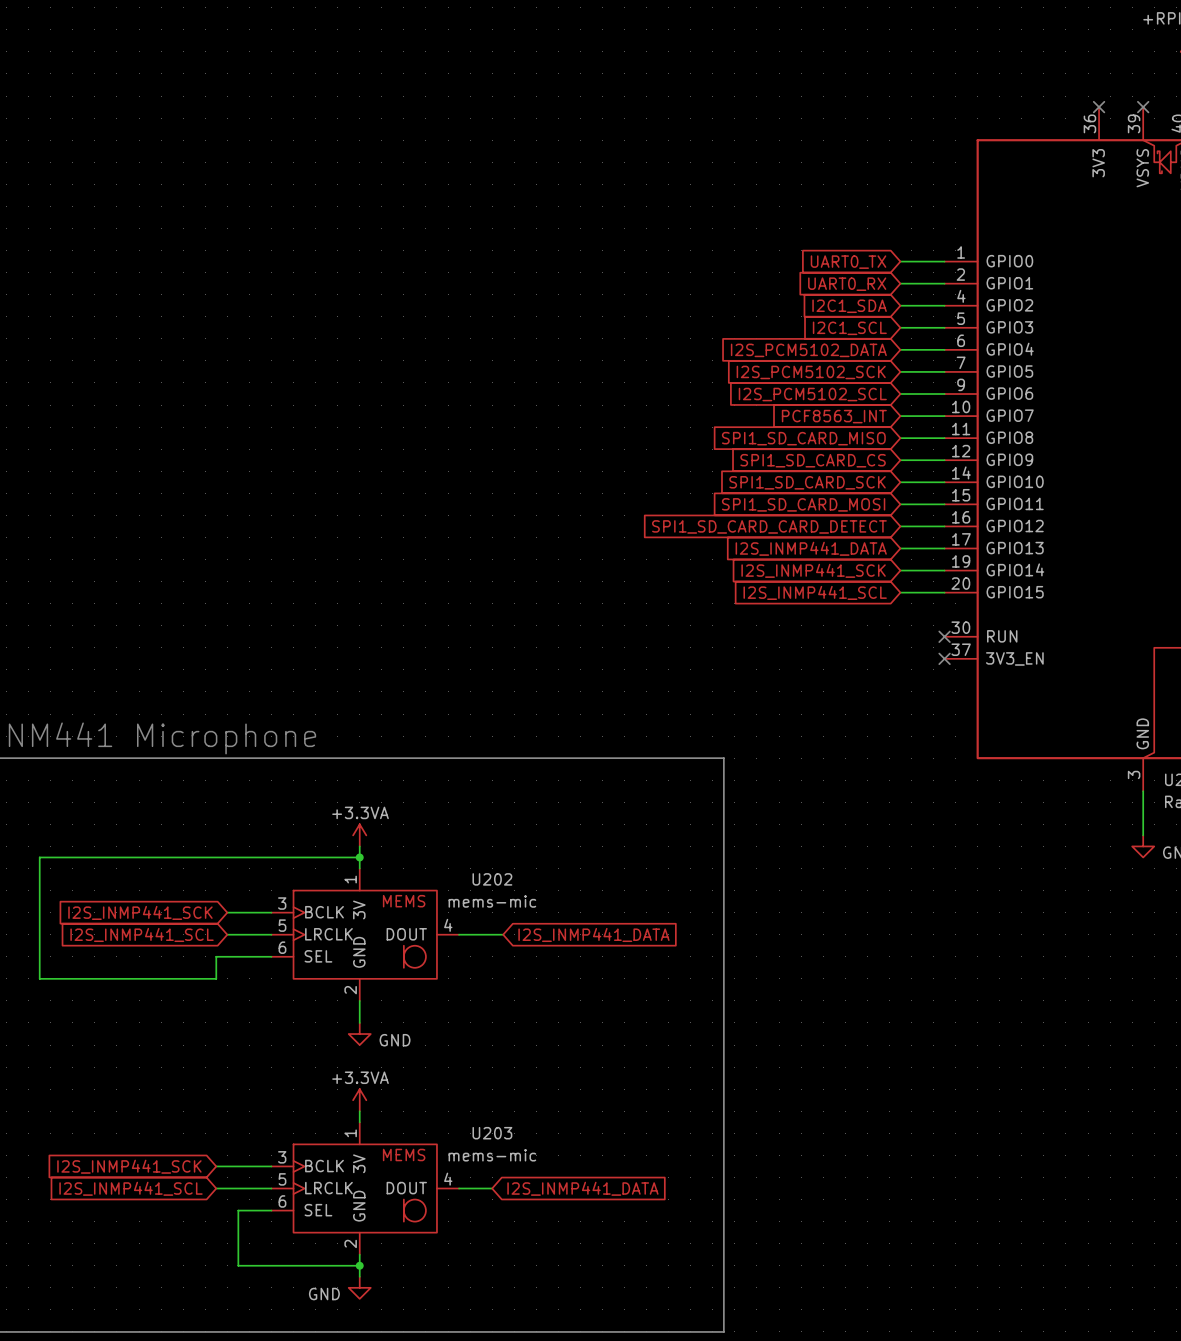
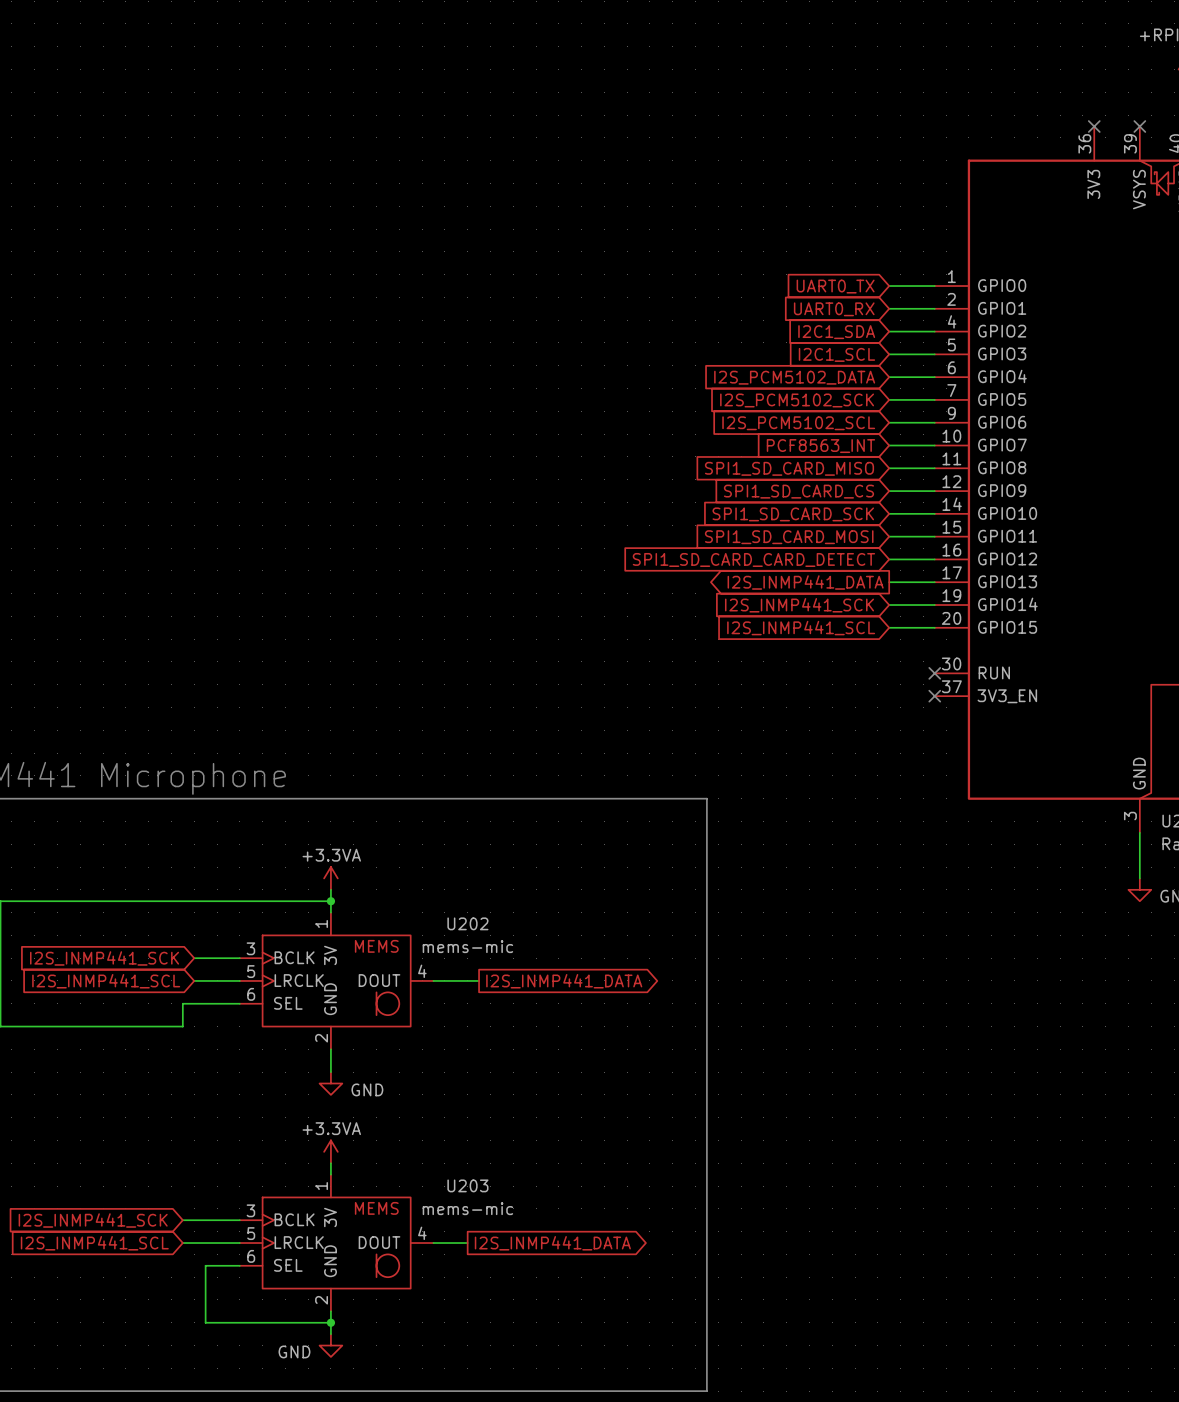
global label shape: input (811, 548) -> output (805, 582)
global label shape: input (593, 934) -> output (564, 981)
global label shape: input (582, 1188) -> output (552, 1243)

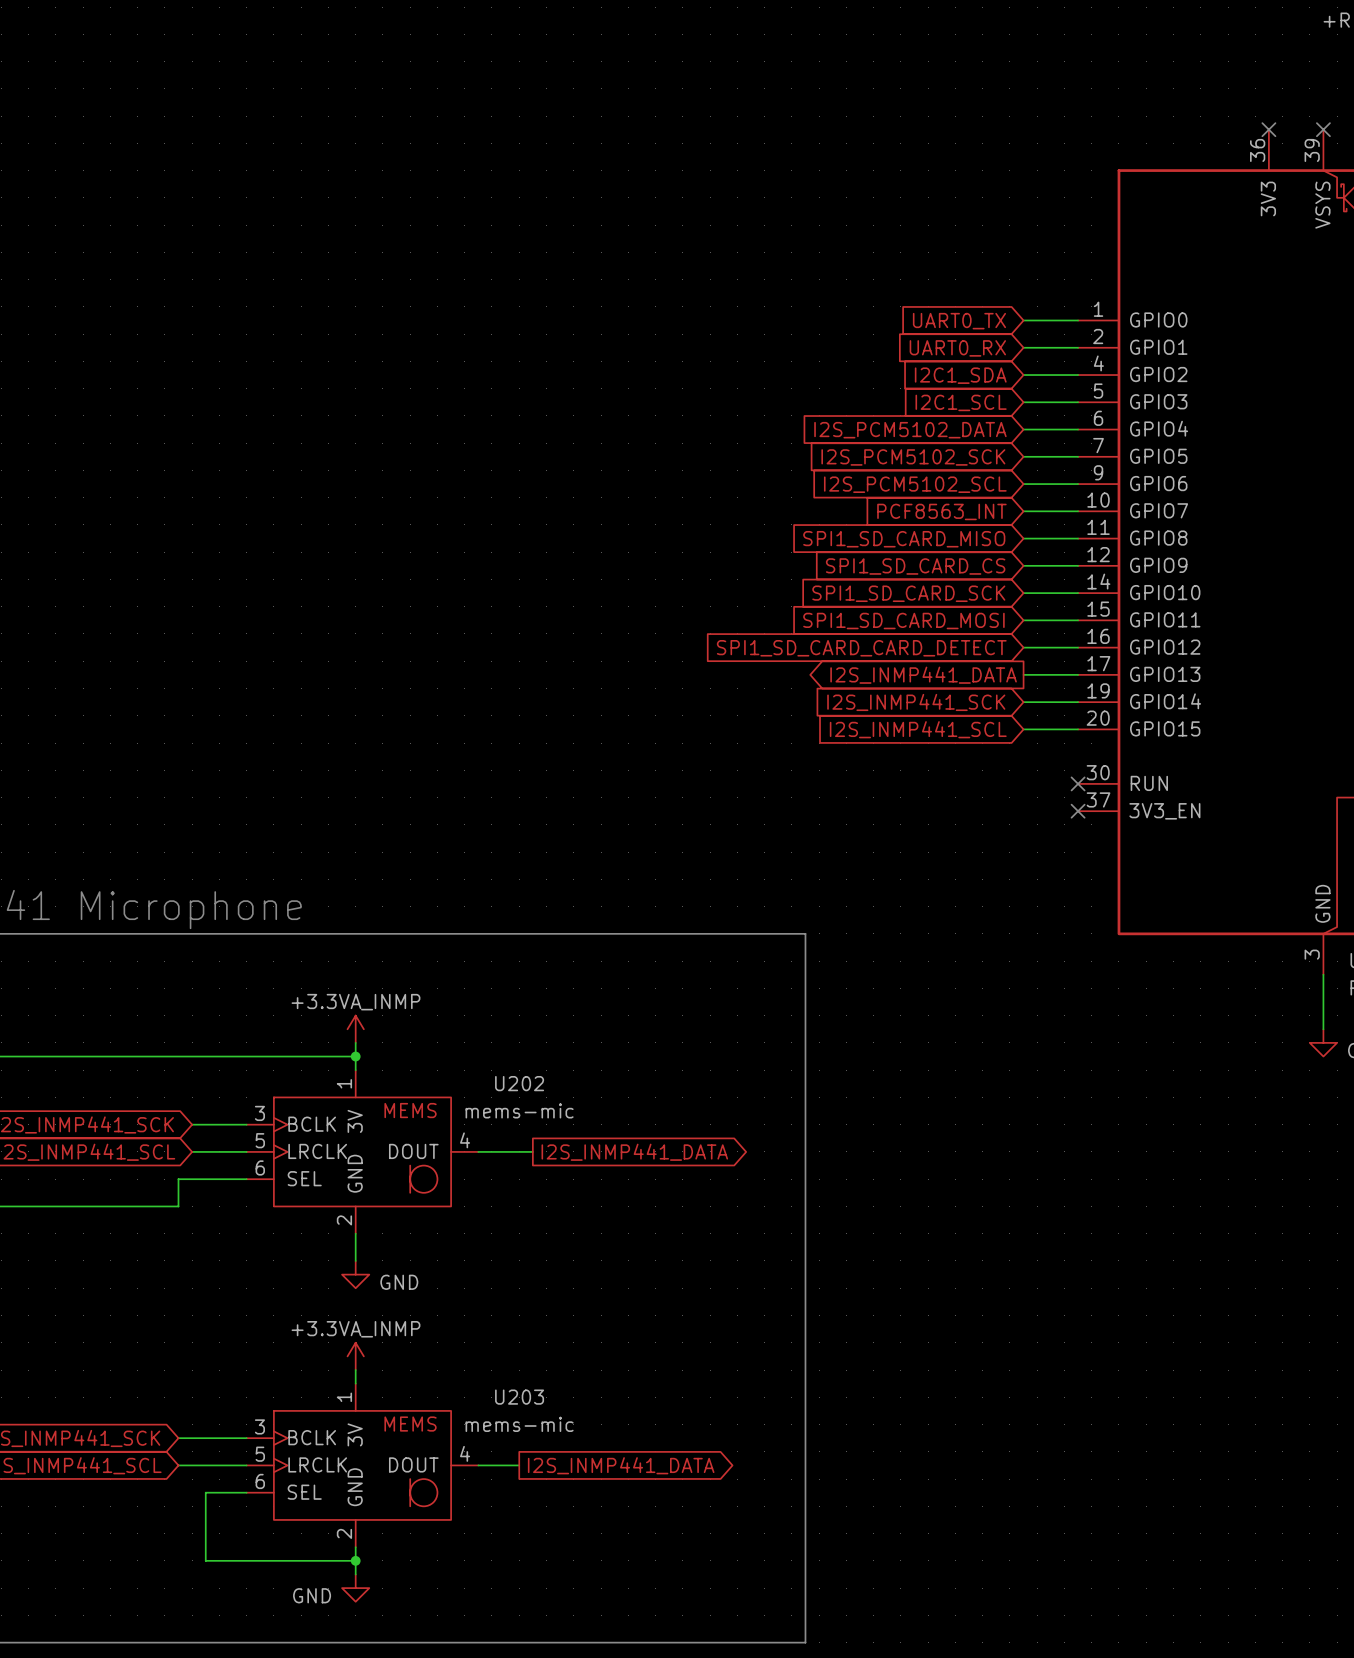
power symbol: +3.3VA (330, 878) -> +3.3VA_INMP (355, 1029)
power symbol: +3.3VA (330, 1151) -> +3.3VA_INMP (355, 1356)

